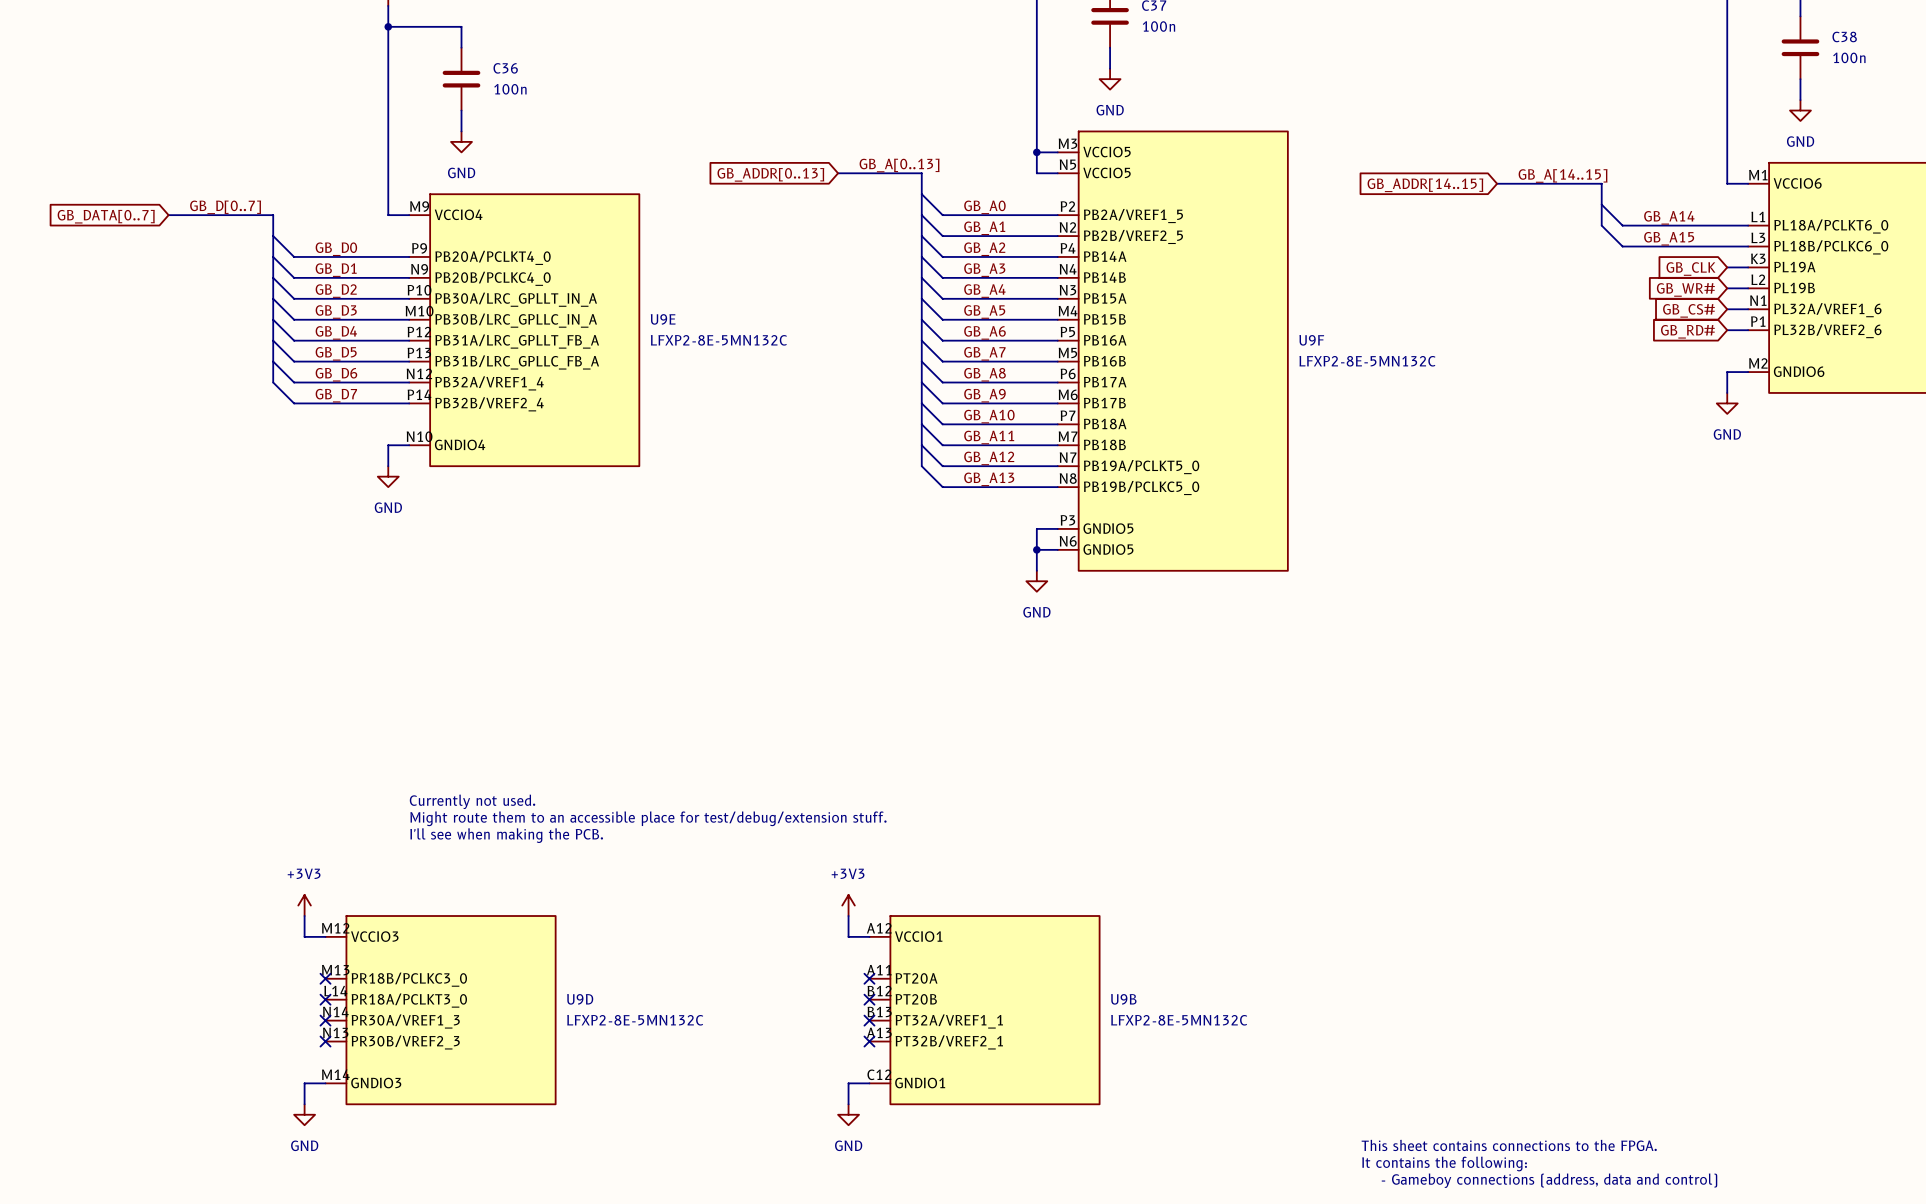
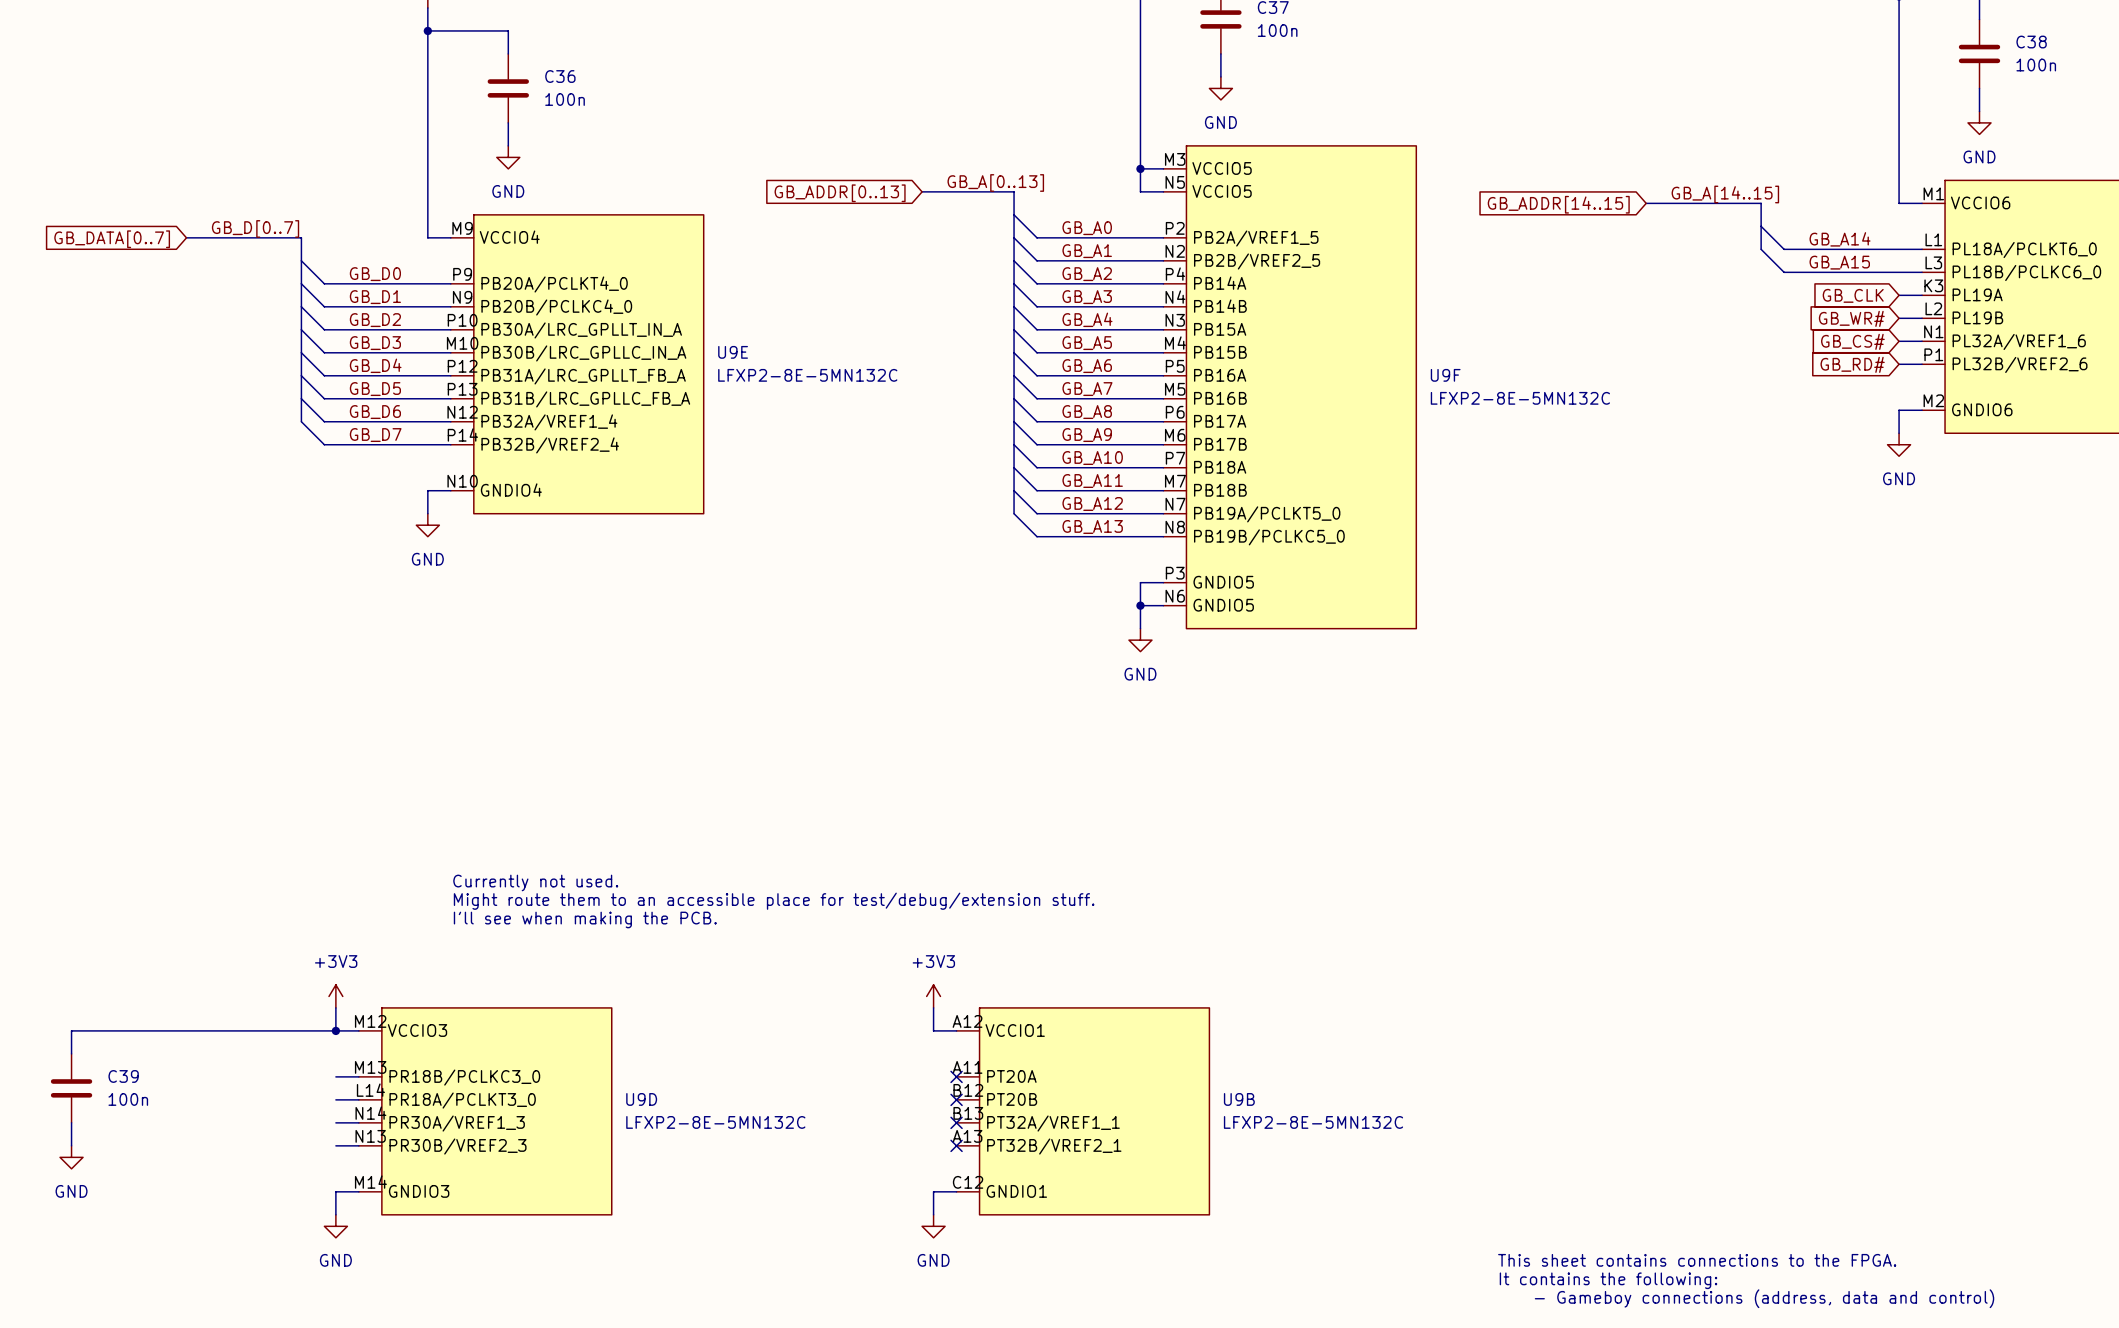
wire: none -> (335, 1030) (71, 1030) (71, 1053)
junction: none -> (335, 1030)
wire: none -> (335, 1076) (358, 1076)
no-connect mark: (325, 978) -> none
C39: none -> 100n (71, 1088)
wire: none -> (335, 1099) (358, 1099)
no-connect mark: (325, 999) -> none
wire: none -> (71, 1122) (71, 1145)
wire: none -> (335, 1122) (358, 1122)
no-connect mark: (325, 1020) -> none
wire: none -> (335, 1145) (358, 1145)
no-connect mark: (325, 1041) -> none
power symbol: none -> GND (71, 1157)

